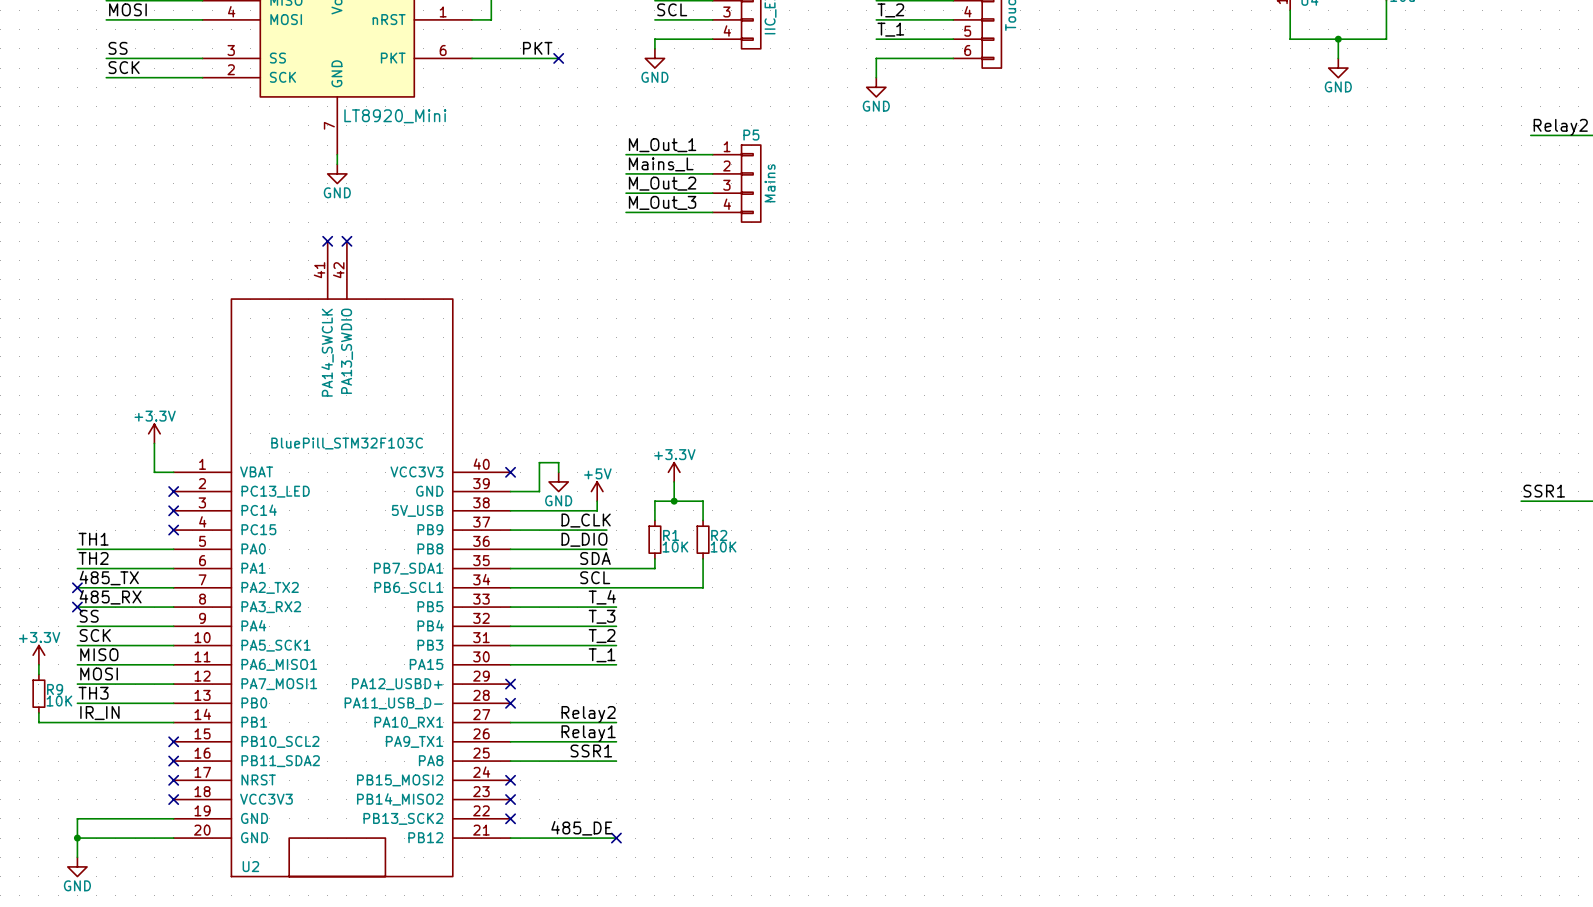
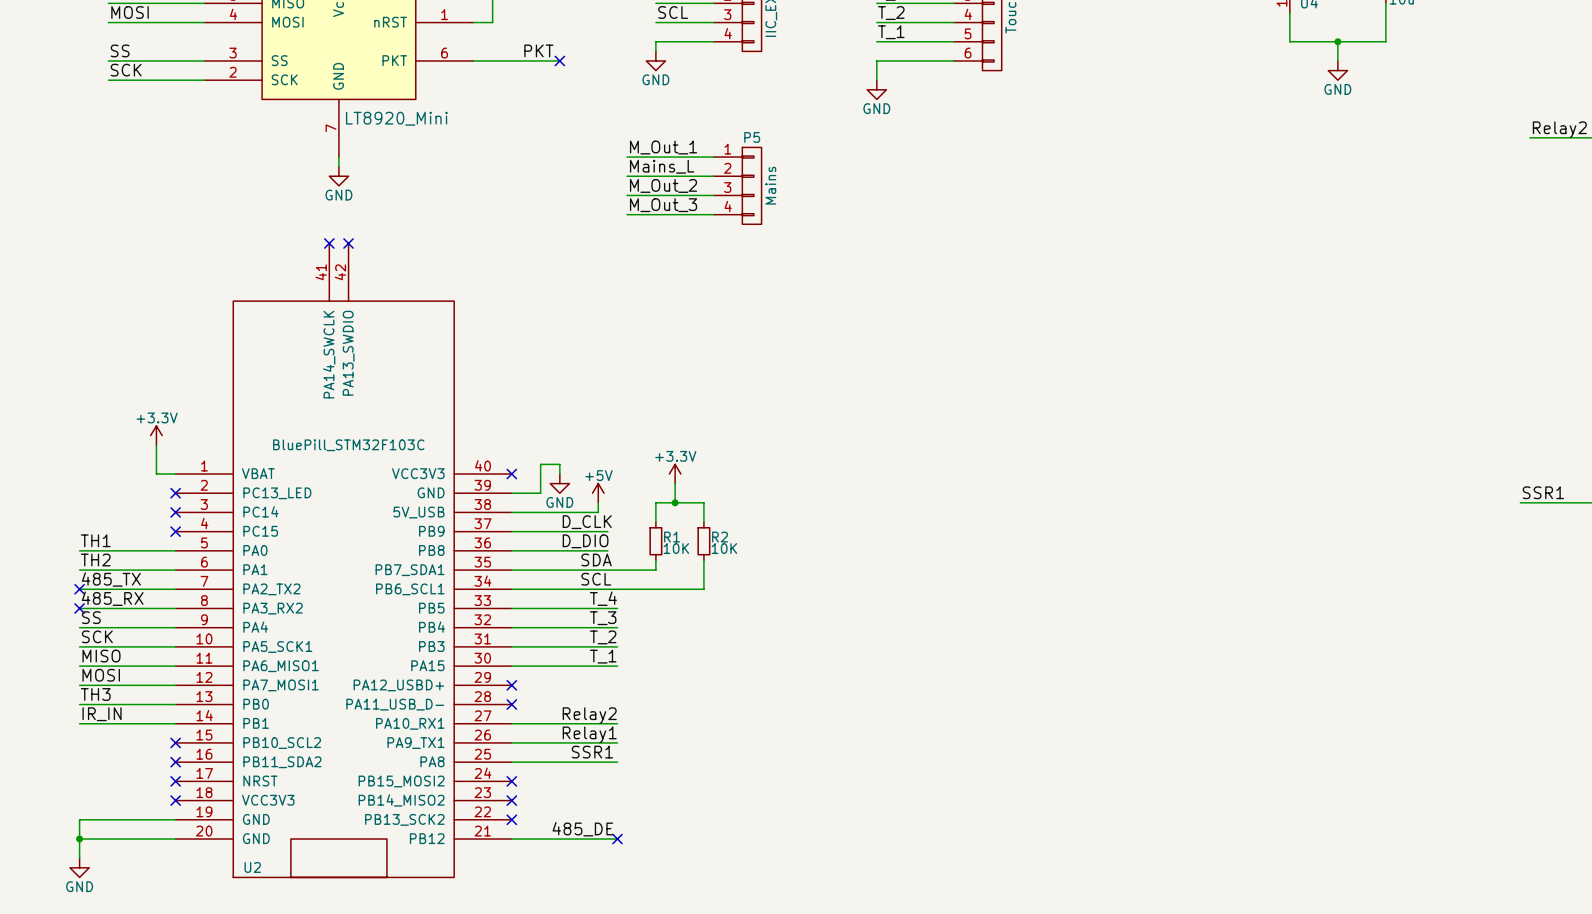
power symbol: +3.3V (38, 655) -> none
wire: (38, 664) (38, 674) -> none
R9: 10K (38, 693) -> none
wire: (38, 712) (38, 722) (77, 722) -> none

